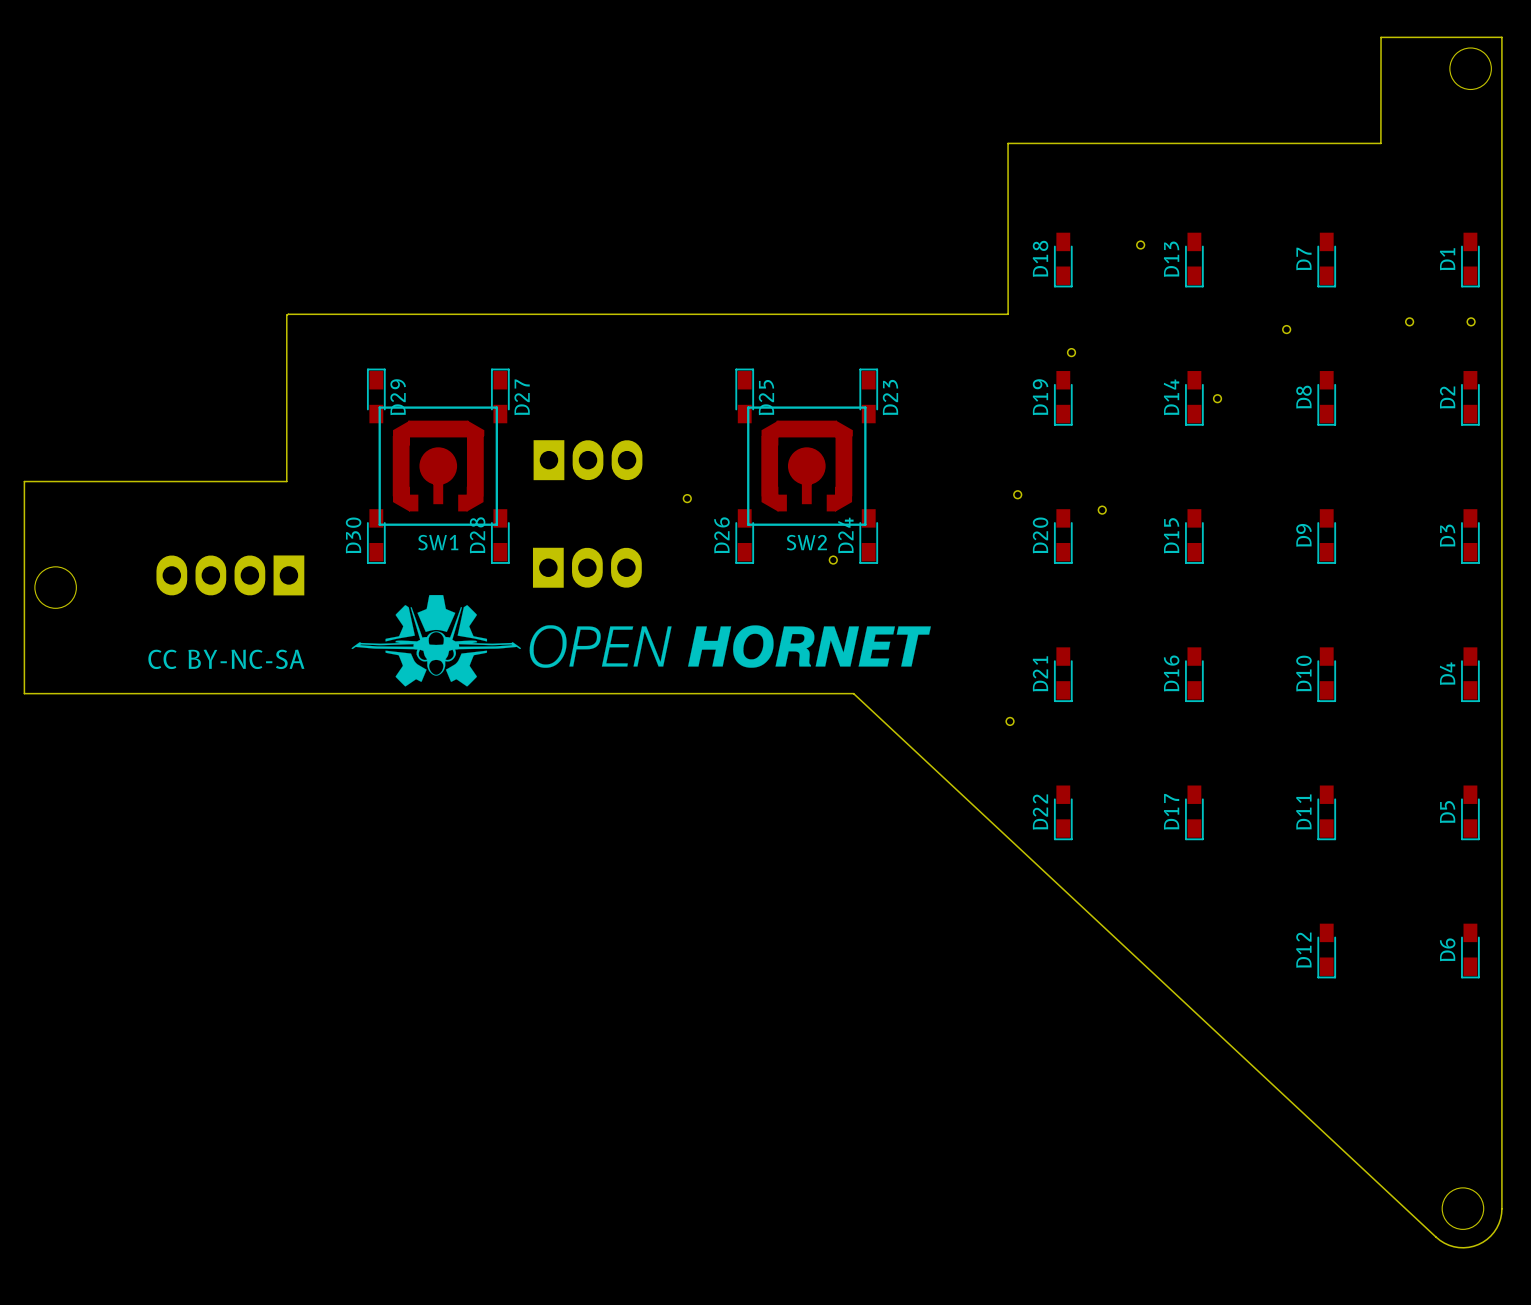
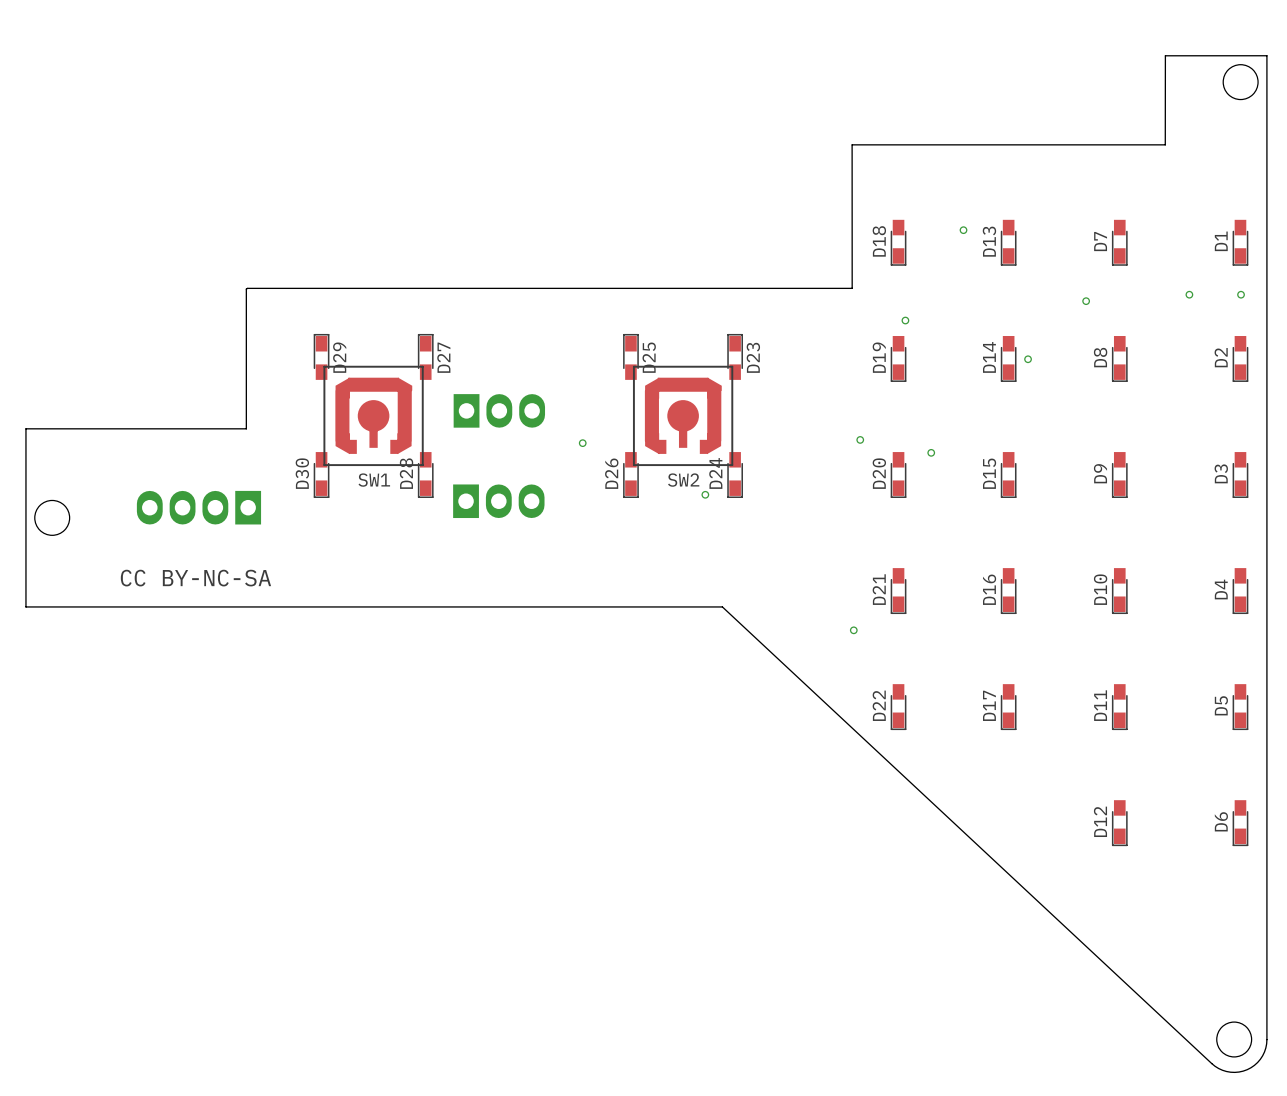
drawing: [351, 595, 931, 687] -> none

